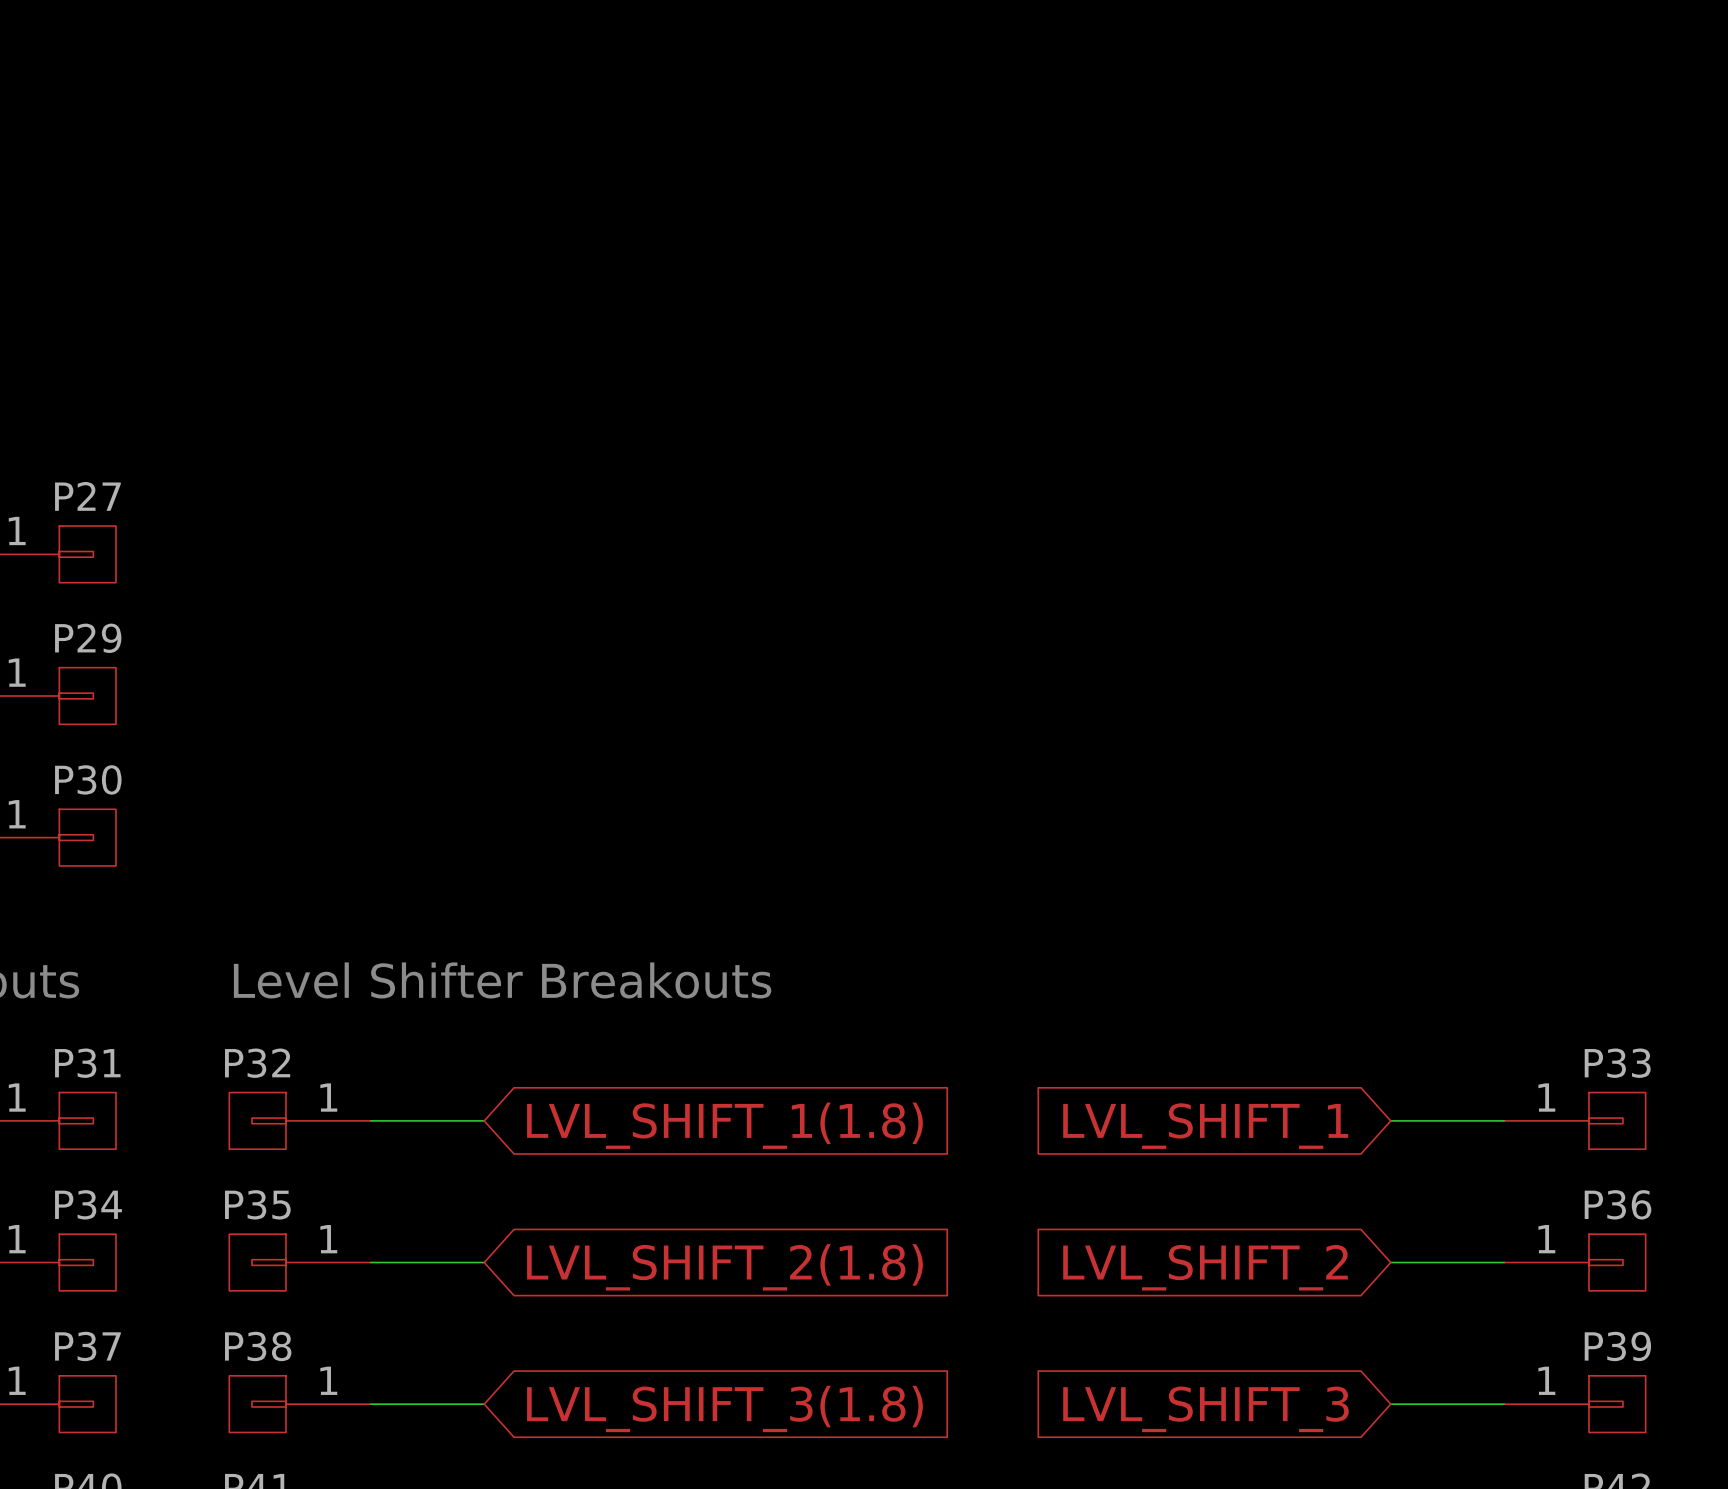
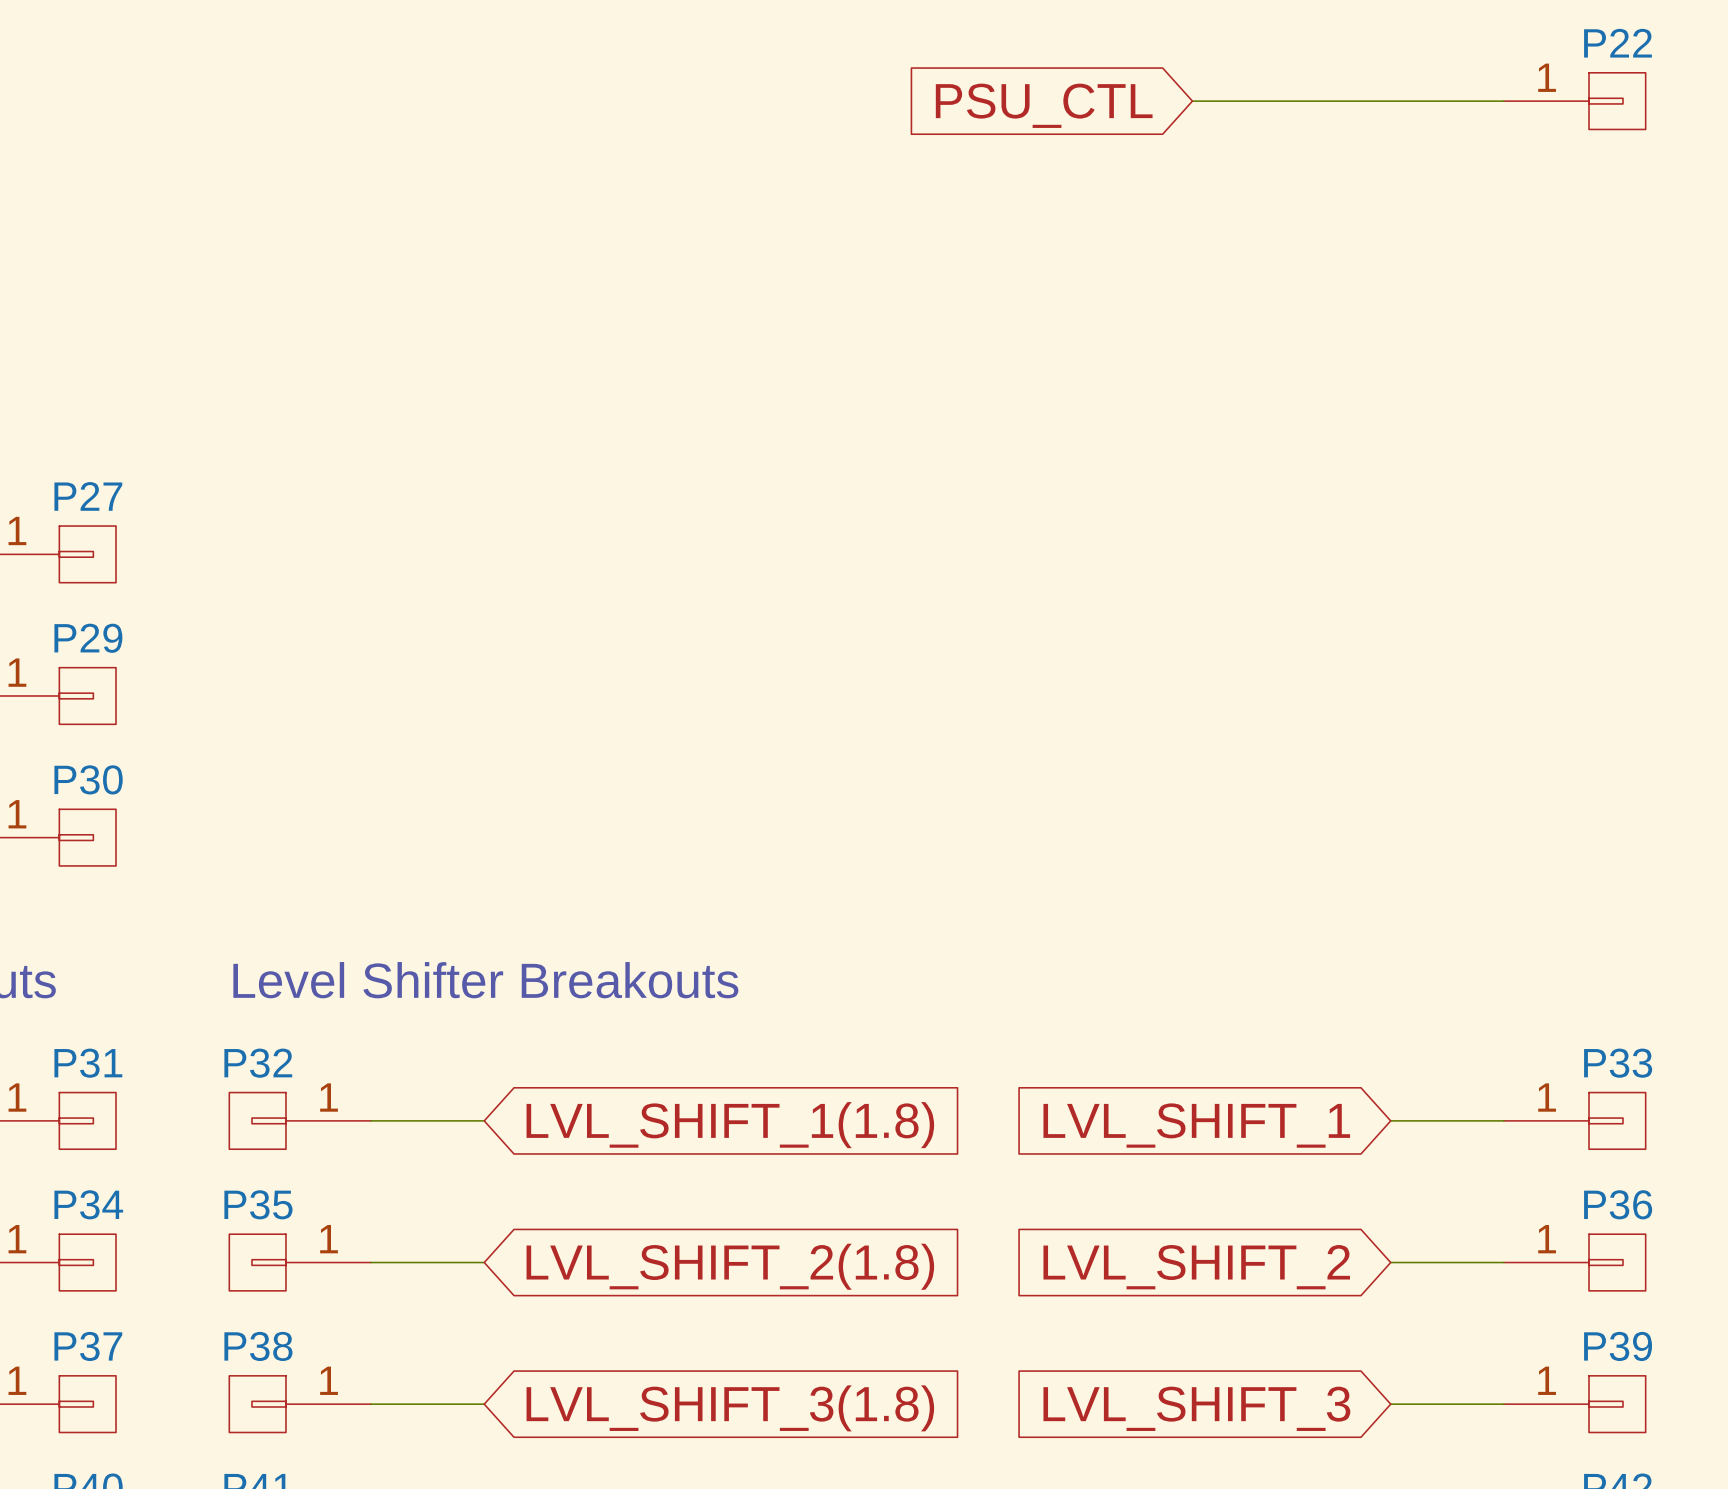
wire: none -> (1192, 101) (1504, 101)
P22: none -> (1574, 101)
global label: none -> PSU_CTL (1044, 105)

